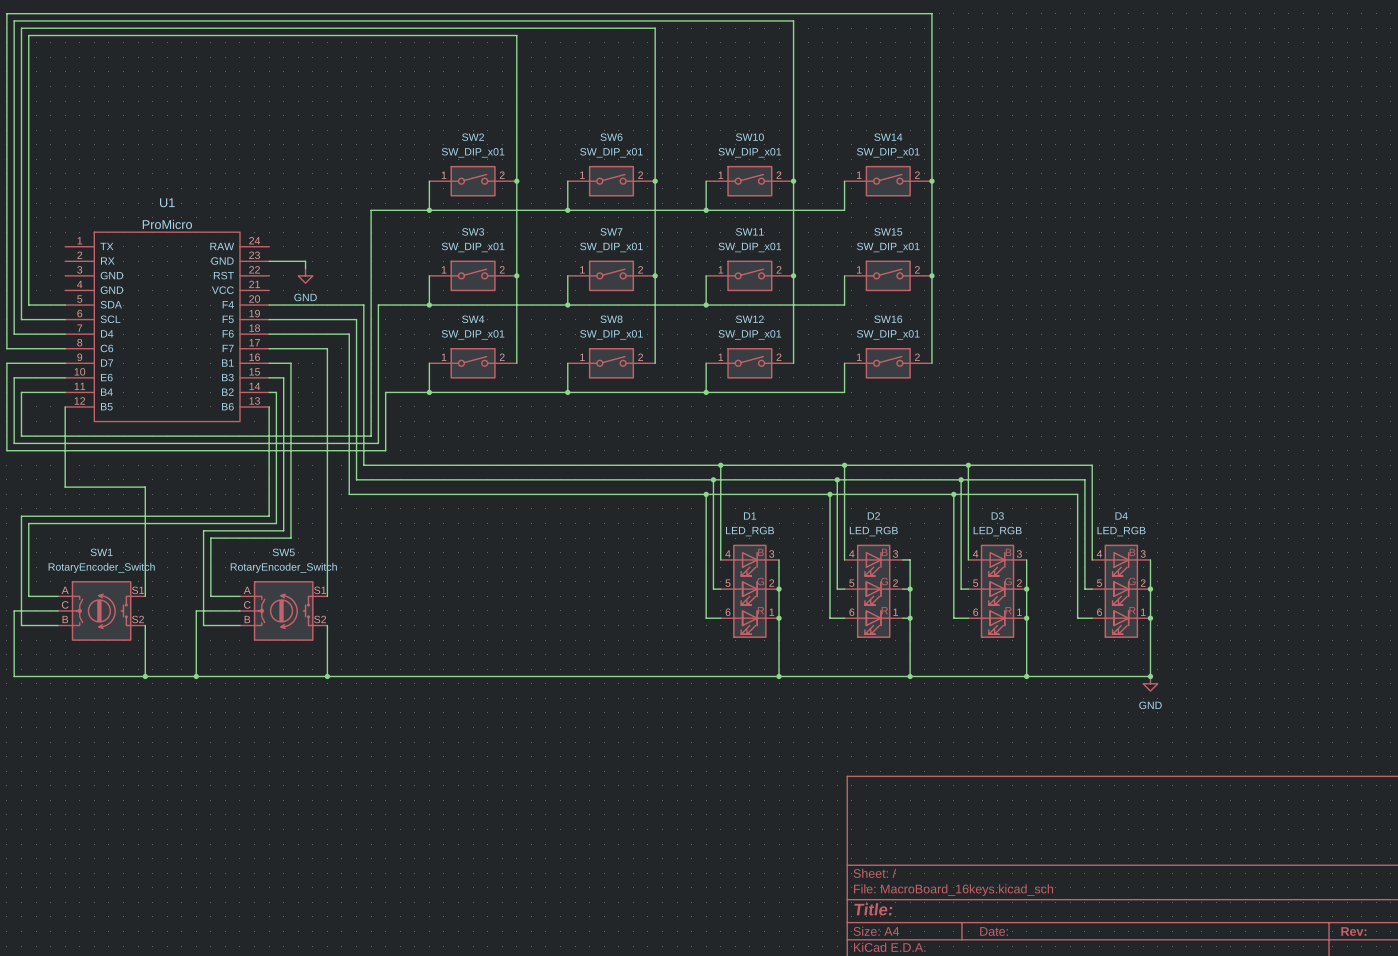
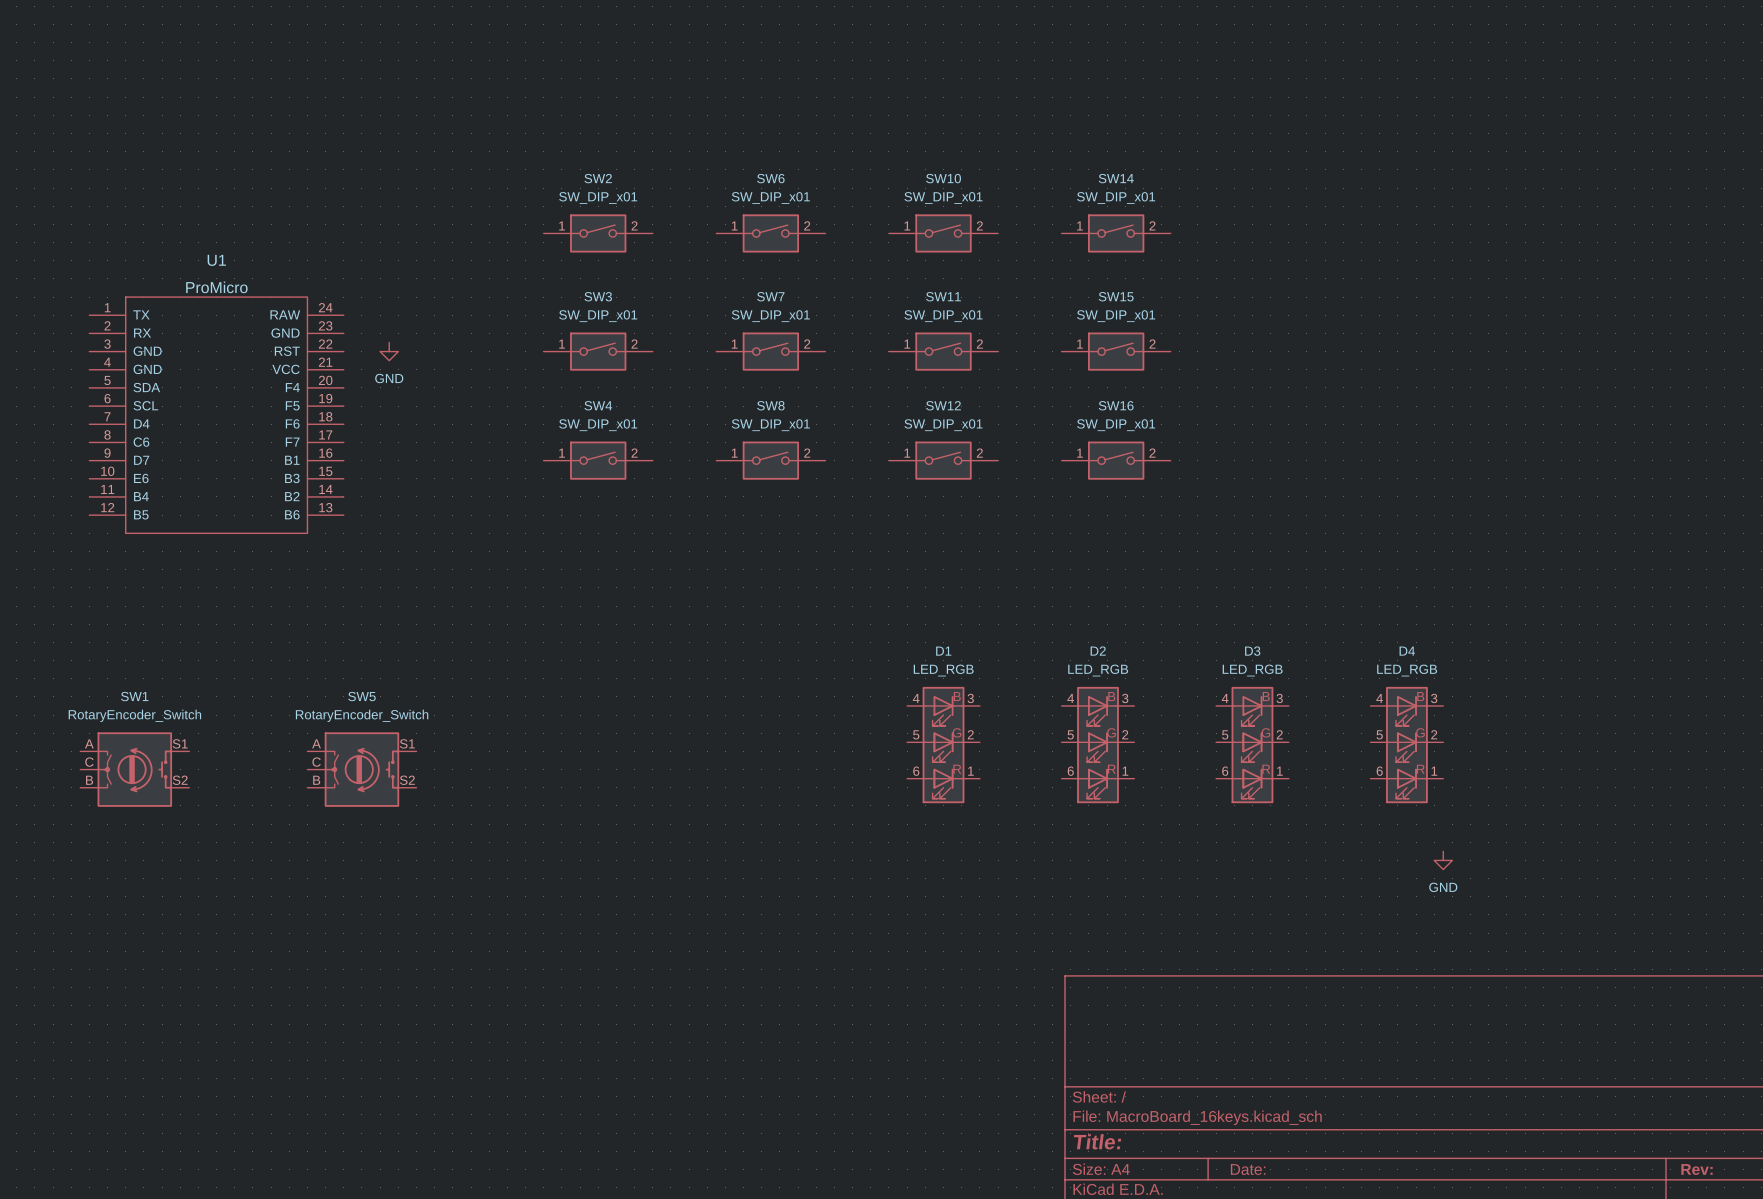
wire: (429, 181) (429, 210) -> none
junction: (516, 181) -> none
wire: (567, 181) (567, 210) -> none
junction: (655, 181) -> none
wire: (706, 181) (706, 210) -> none
junction: (793, 181) -> none
wire: (844, 181) (844, 210) (371, 210) (371, 436) (21, 436) (21, 392) (65, 392) -> none
junction: (931, 181) -> none
junction: (429, 210) -> none
junction: (567, 210) -> none
junction: (706, 210) -> none
wire: (269, 261) (305, 261) (305, 268) -> none
wire: (429, 275) (429, 305) -> none
junction: (516, 275) -> none
wire: (567, 275) (567, 305) -> none
junction: (655, 275) -> none
wire: (706, 275) (706, 305) -> none
junction: (793, 275) -> none
wire: (844, 275) (844, 305) (378, 305) (378, 443) (14, 443) (14, 377) (65, 377) -> none
junction: (931, 275) -> none
wire: (65, 305) (28, 305) (28, 35) (516, 35) (516, 363) -> none
wire: (269, 305) (363, 305) (363, 465) (1092, 465) (1092, 559) -> none
junction: (429, 305) -> none
junction: (567, 305) -> none
junction: (706, 305) -> none
wire: (65, 319) (21, 319) (21, 28) (655, 28) (655, 363) -> none
wire: (269, 319) (356, 319) (356, 479) (1084, 479) (1084, 589) (1092, 589) -> none
wire: (65, 334) (14, 334) (14, 20) (793, 20) (793, 363) -> none
wire: (269, 334) (349, 334) (349, 494) (1077, 494) (1077, 618) (1092, 618) -> none
wire: (65, 348) (6, 348) (6, 13) (931, 13) (931, 363) -> none
wire: (269, 348) (327, 348) (327, 596) -> none
wire: (65, 363) (6, 363) (6, 450) (385, 450) (385, 392) (844, 392) (844, 363) -> none
wire: (269, 363) (290, 363) (290, 538) (210, 538) (210, 596) (239, 596) -> none
wire: (429, 363) (429, 392) -> none
wire: (567, 363) (567, 392) -> none
wire: (706, 363) (706, 392) -> none
wire: (269, 377) (283, 377) (283, 530) (203, 530) (203, 625) (239, 625) -> none
wire: (269, 392) (276, 392) (276, 523) (28, 523) (28, 596) (57, 596) -> none
junction: (429, 392) -> none
junction: (567, 392) -> none
junction: (706, 392) -> none
wire: (65, 406) (65, 487) (145, 487) (145, 596) -> none
wire: (269, 406) (269, 516) (21, 516) (21, 625) (57, 625) -> none
wire: (720, 465) (720, 559) -> none
junction: (720, 465) -> none
wire: (844, 465) (844, 559) -> none
junction: (844, 465) -> none
wire: (968, 465) (968, 559) -> none
junction: (968, 465) -> none
wire: (713, 479) (713, 589) (720, 589) -> none
junction: (713, 479) -> none
wire: (837, 479) (837, 589) (844, 589) -> none
junction: (837, 479) -> none
wire: (961, 479) (961, 589) (968, 589) -> none
junction: (961, 479) -> none
wire: (706, 494) (706, 618) (720, 618) -> none
junction: (706, 494) -> none
wire: (829, 494) (829, 618) (844, 618) -> none
junction: (829, 494) -> none
wire: (953, 494) (953, 618) (968, 618) -> none
junction: (953, 494) -> none
wire: (779, 559) (779, 676) -> none
wire: (902, 559) (910, 559) (910, 676) -> none
wire: (1026, 559) (1026, 676) -> none
wire: (1150, 559) (1150, 676) (14, 676) (14, 610) (57, 610) -> none
junction: (779, 589) -> none
wire: (902, 589) (910, 589) -> none
junction: (910, 589) -> none
junction: (1026, 589) -> none
junction: (1150, 589) -> none
wire: (239, 610) (196, 610) (196, 676) -> none
junction: (779, 618) -> none
wire: (902, 618) (910, 618) -> none
junction: (910, 618) -> none
junction: (1026, 618) -> none
junction: (1150, 618) -> none
wire: (145, 625) (145, 676) -> none
wire: (327, 625) (327, 676) -> none
junction: (145, 676) -> none
junction: (196, 676) -> none
junction: (327, 676) -> none
junction: (779, 676) -> none
junction: (910, 676) -> none
junction: (1026, 676) -> none
junction: (1150, 676) -> none

